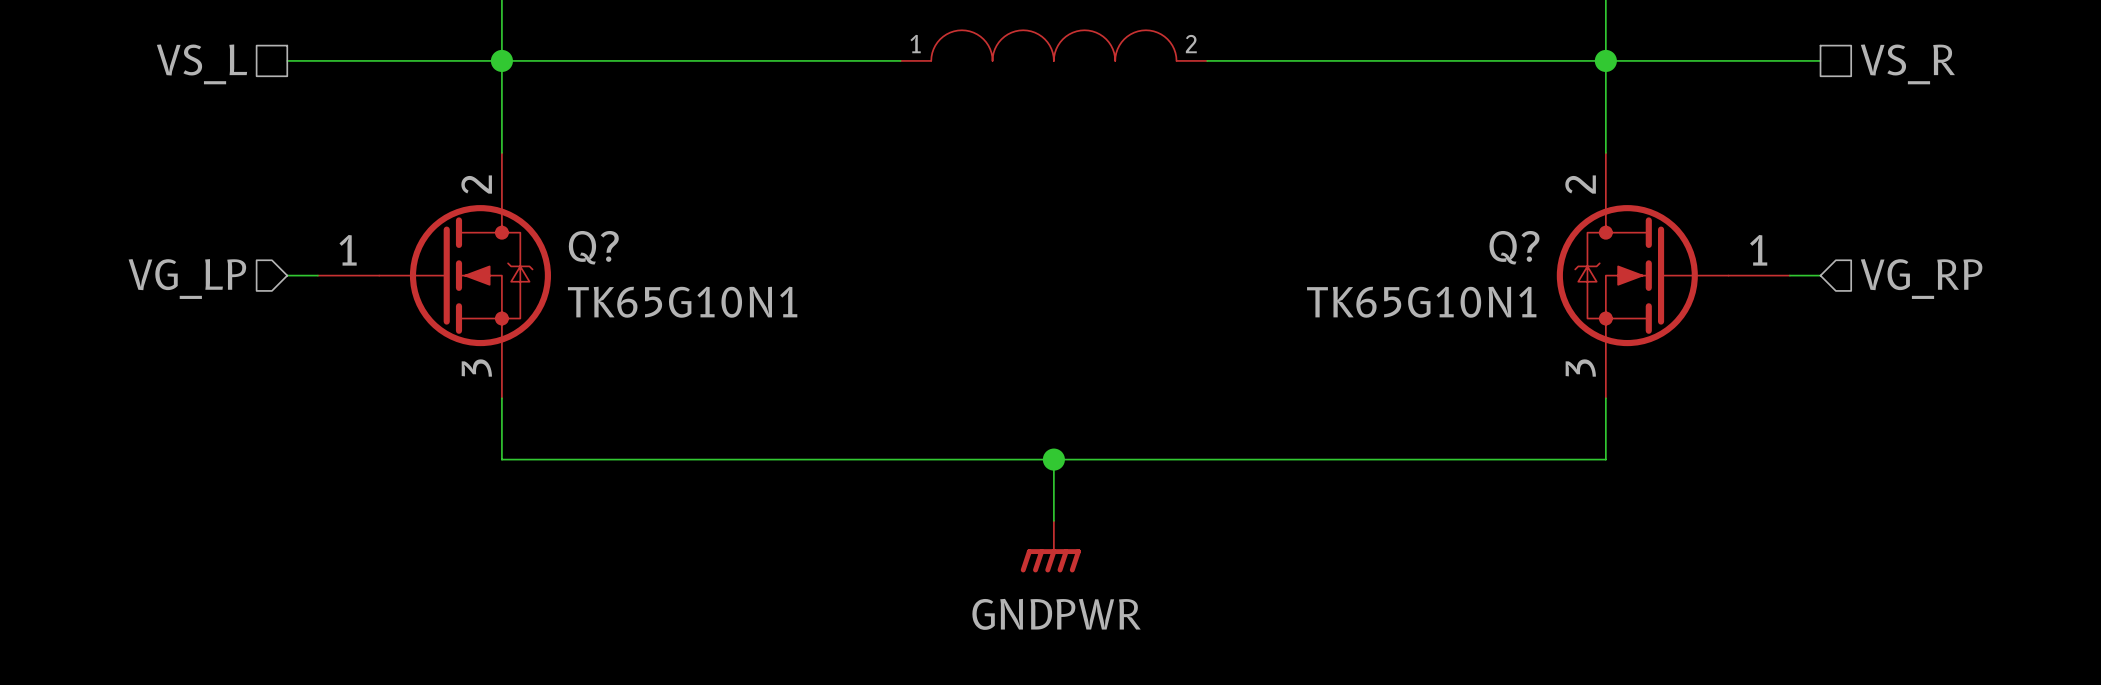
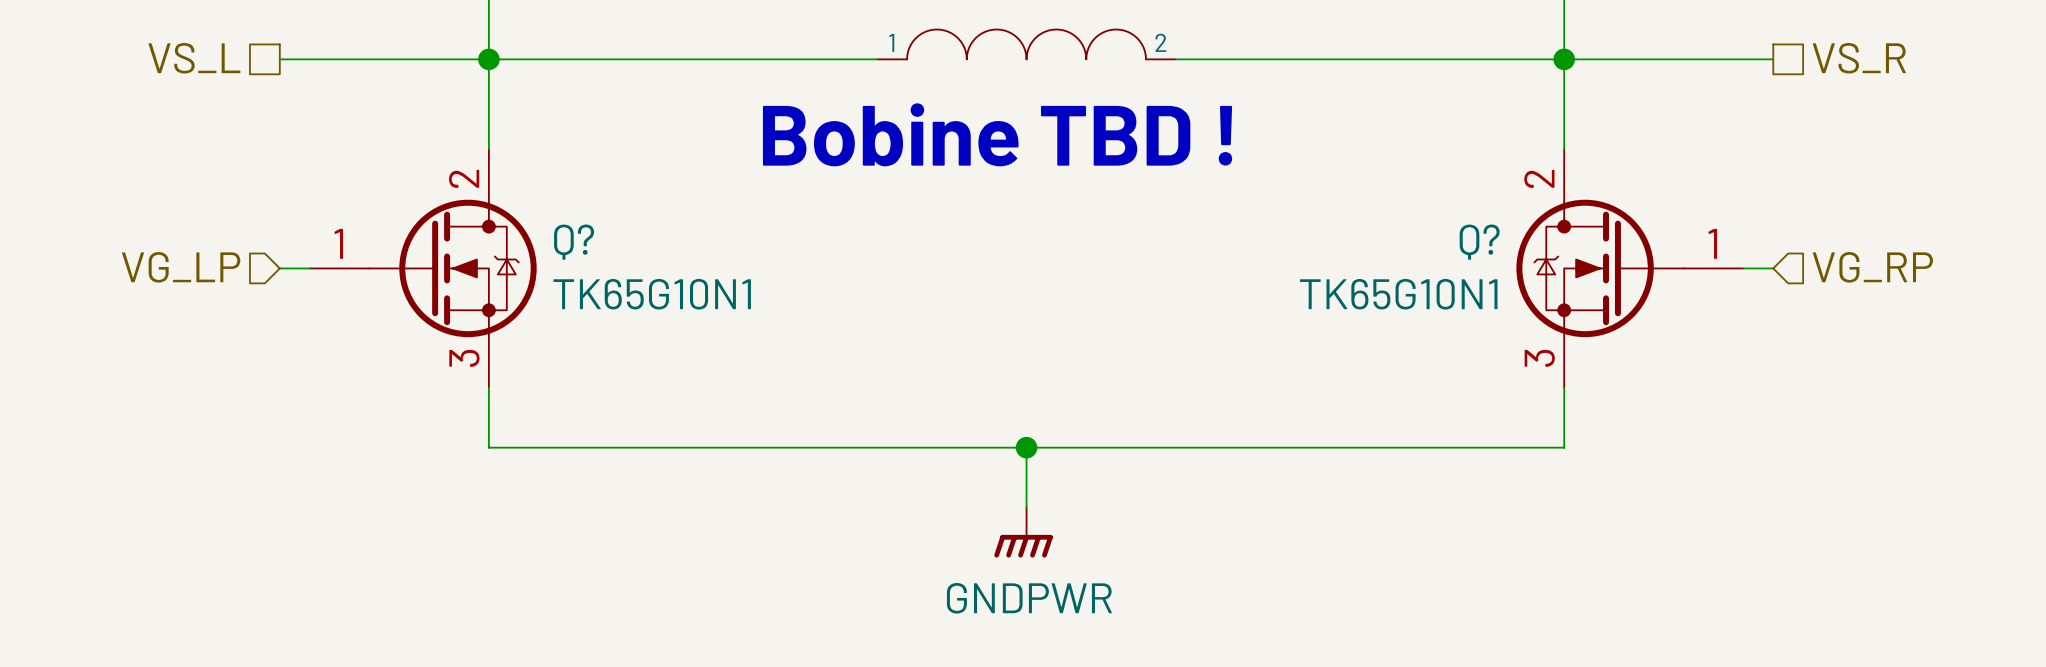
text: none -> Bobine TBD ! (997, 134)

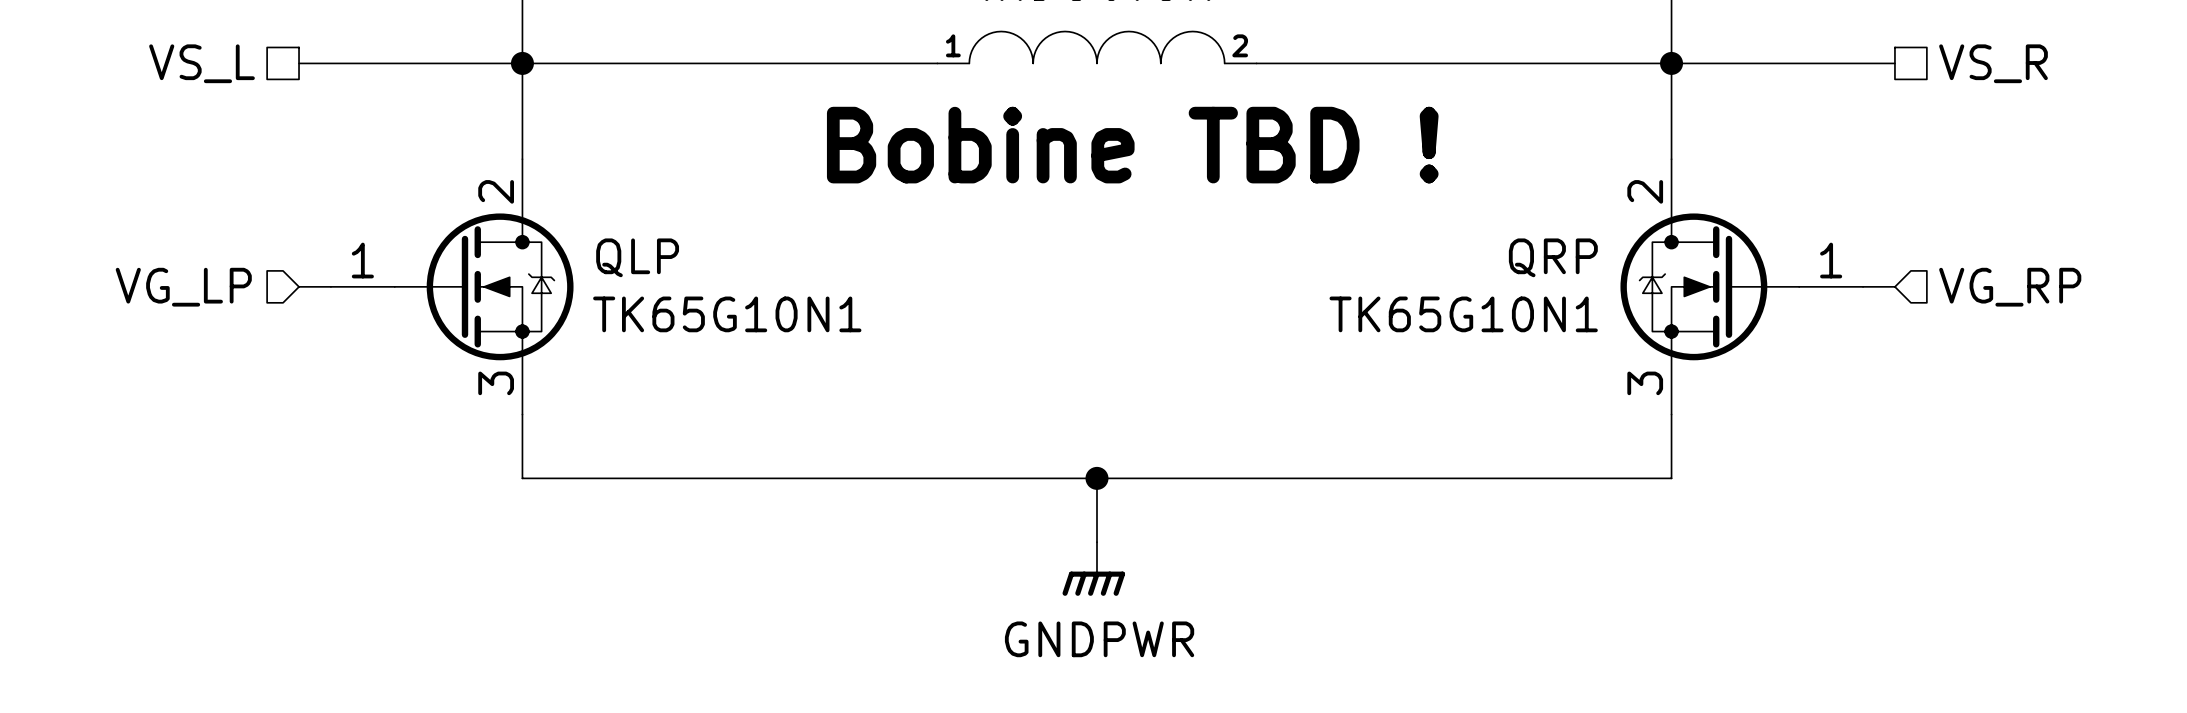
Q? name: Q? (574, 242) -> QLP (637, 257)
Q? name: Q? (1479, 242) -> QRP (1553, 257)

